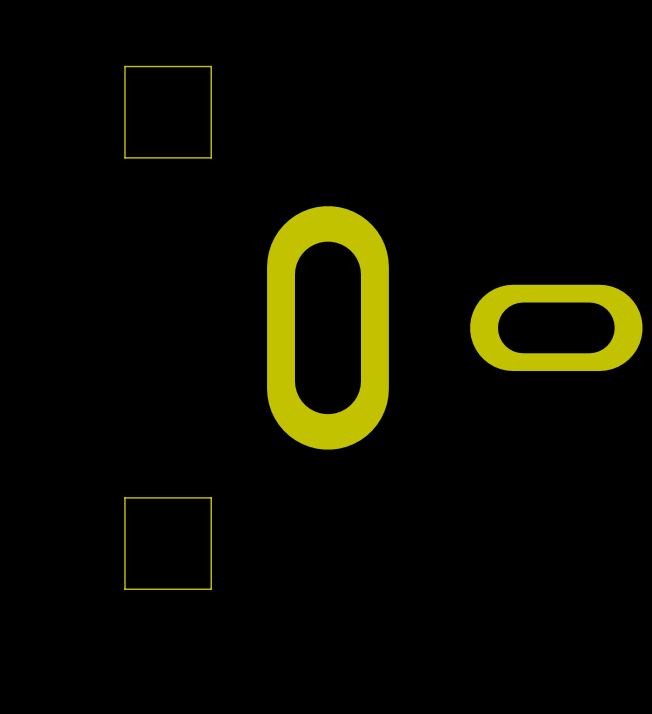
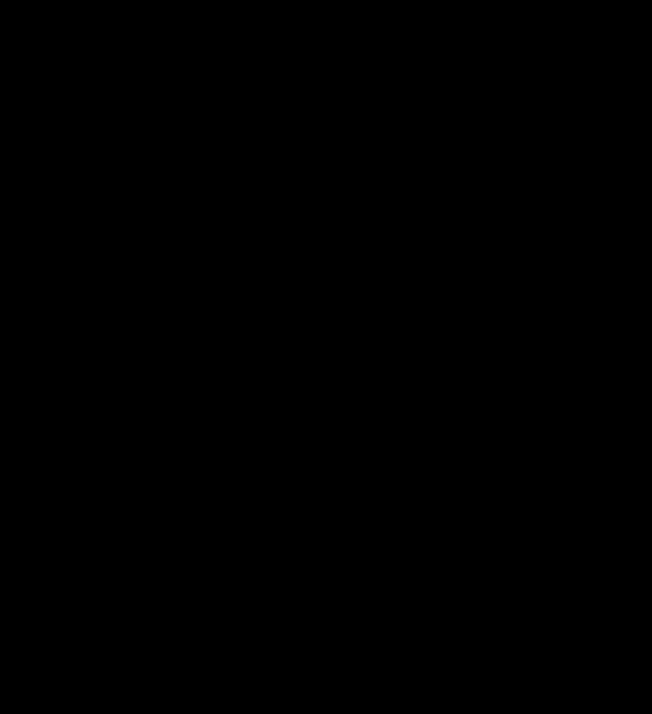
part: (383, 327) -> none

